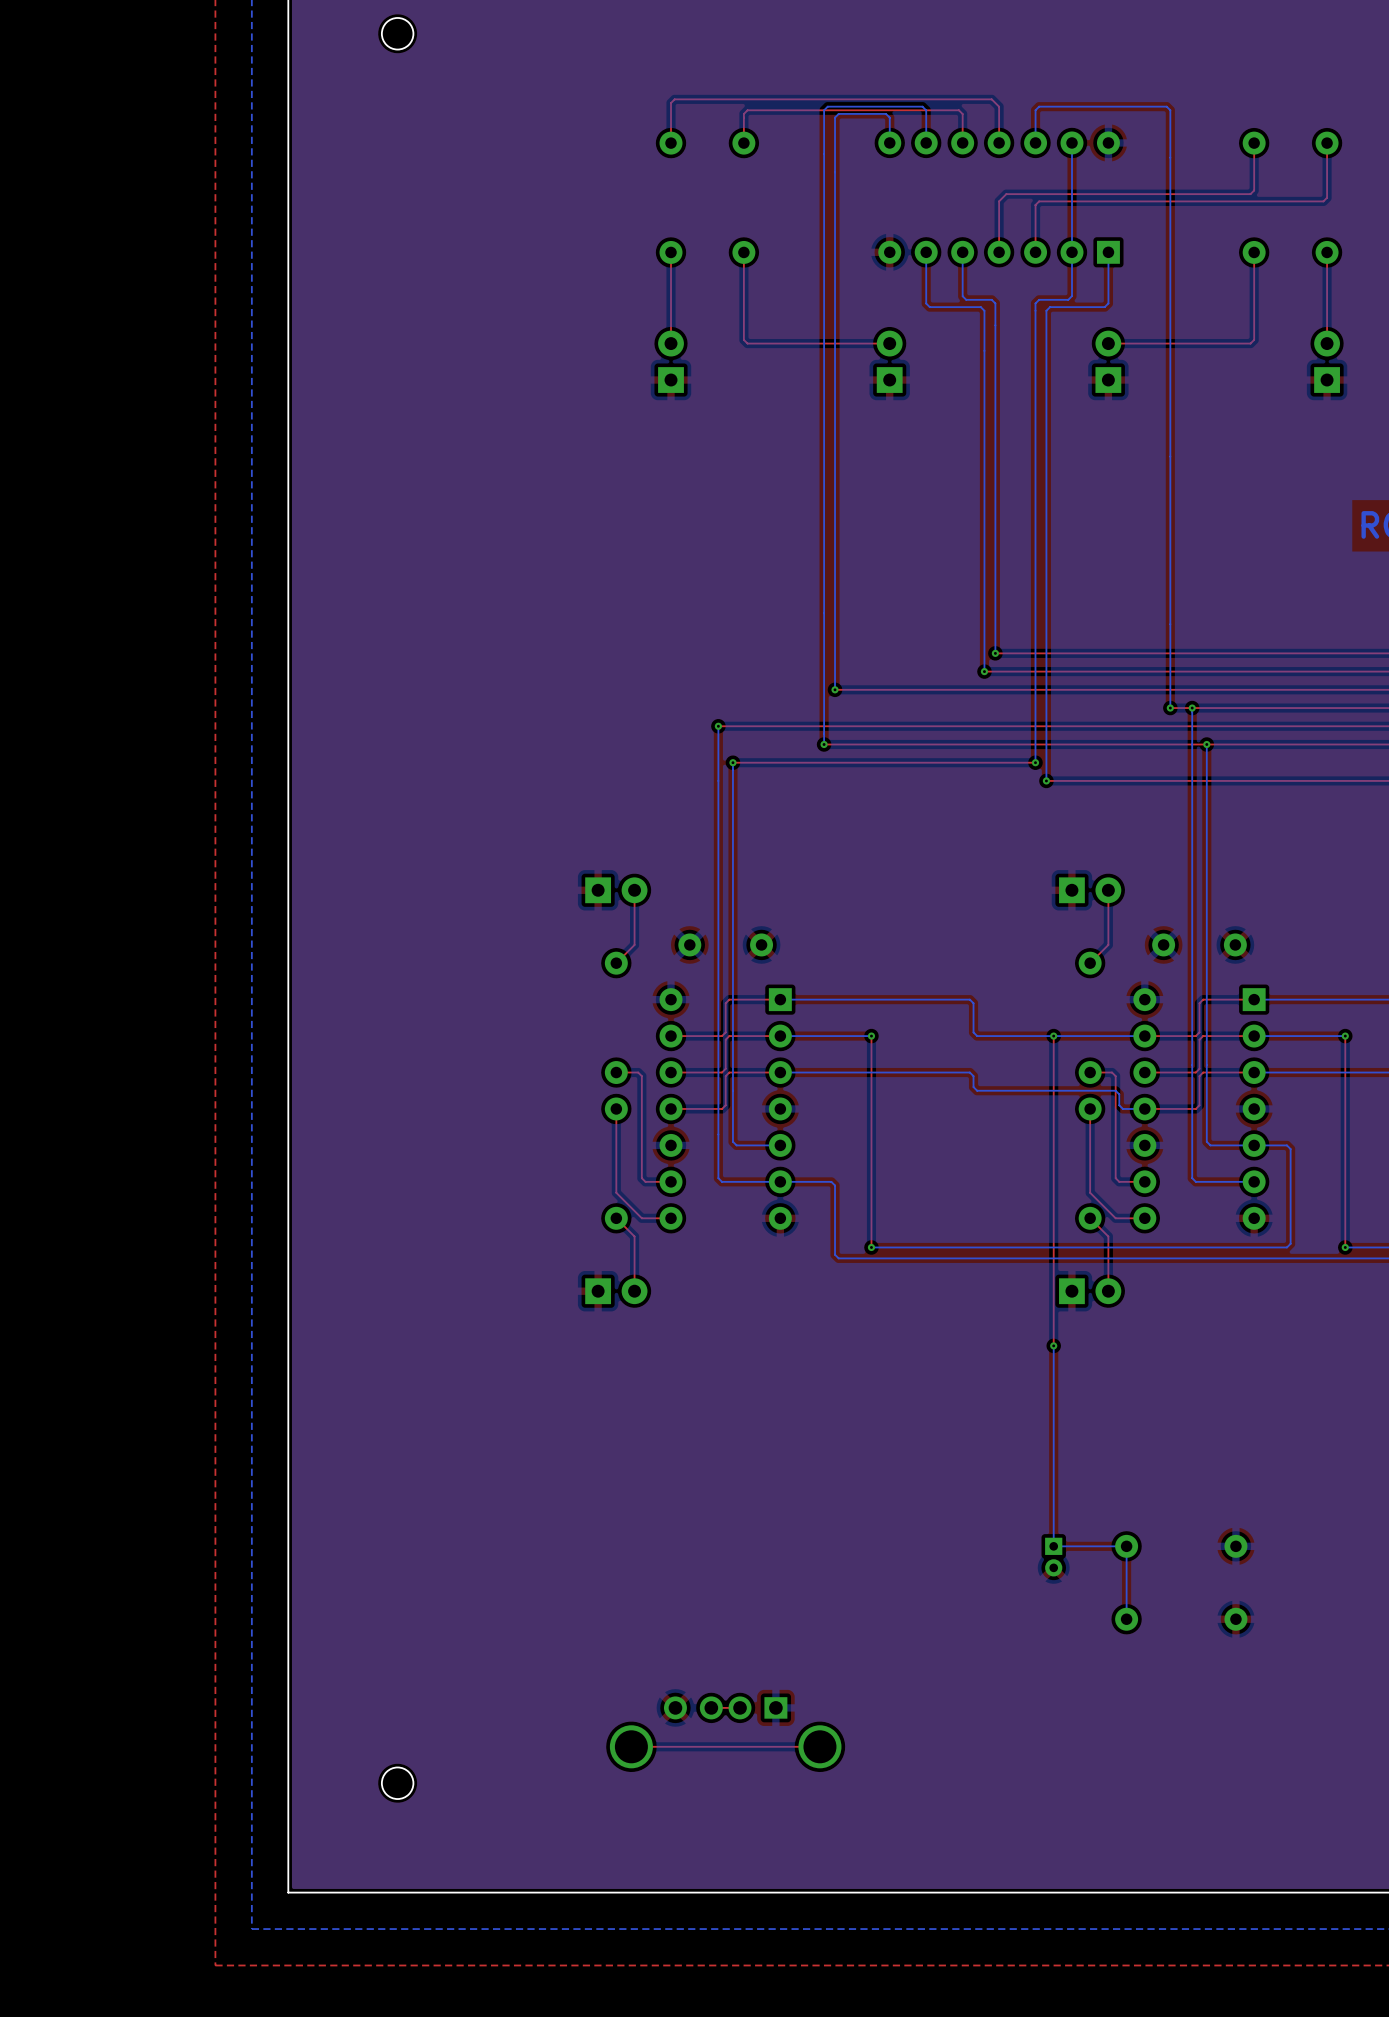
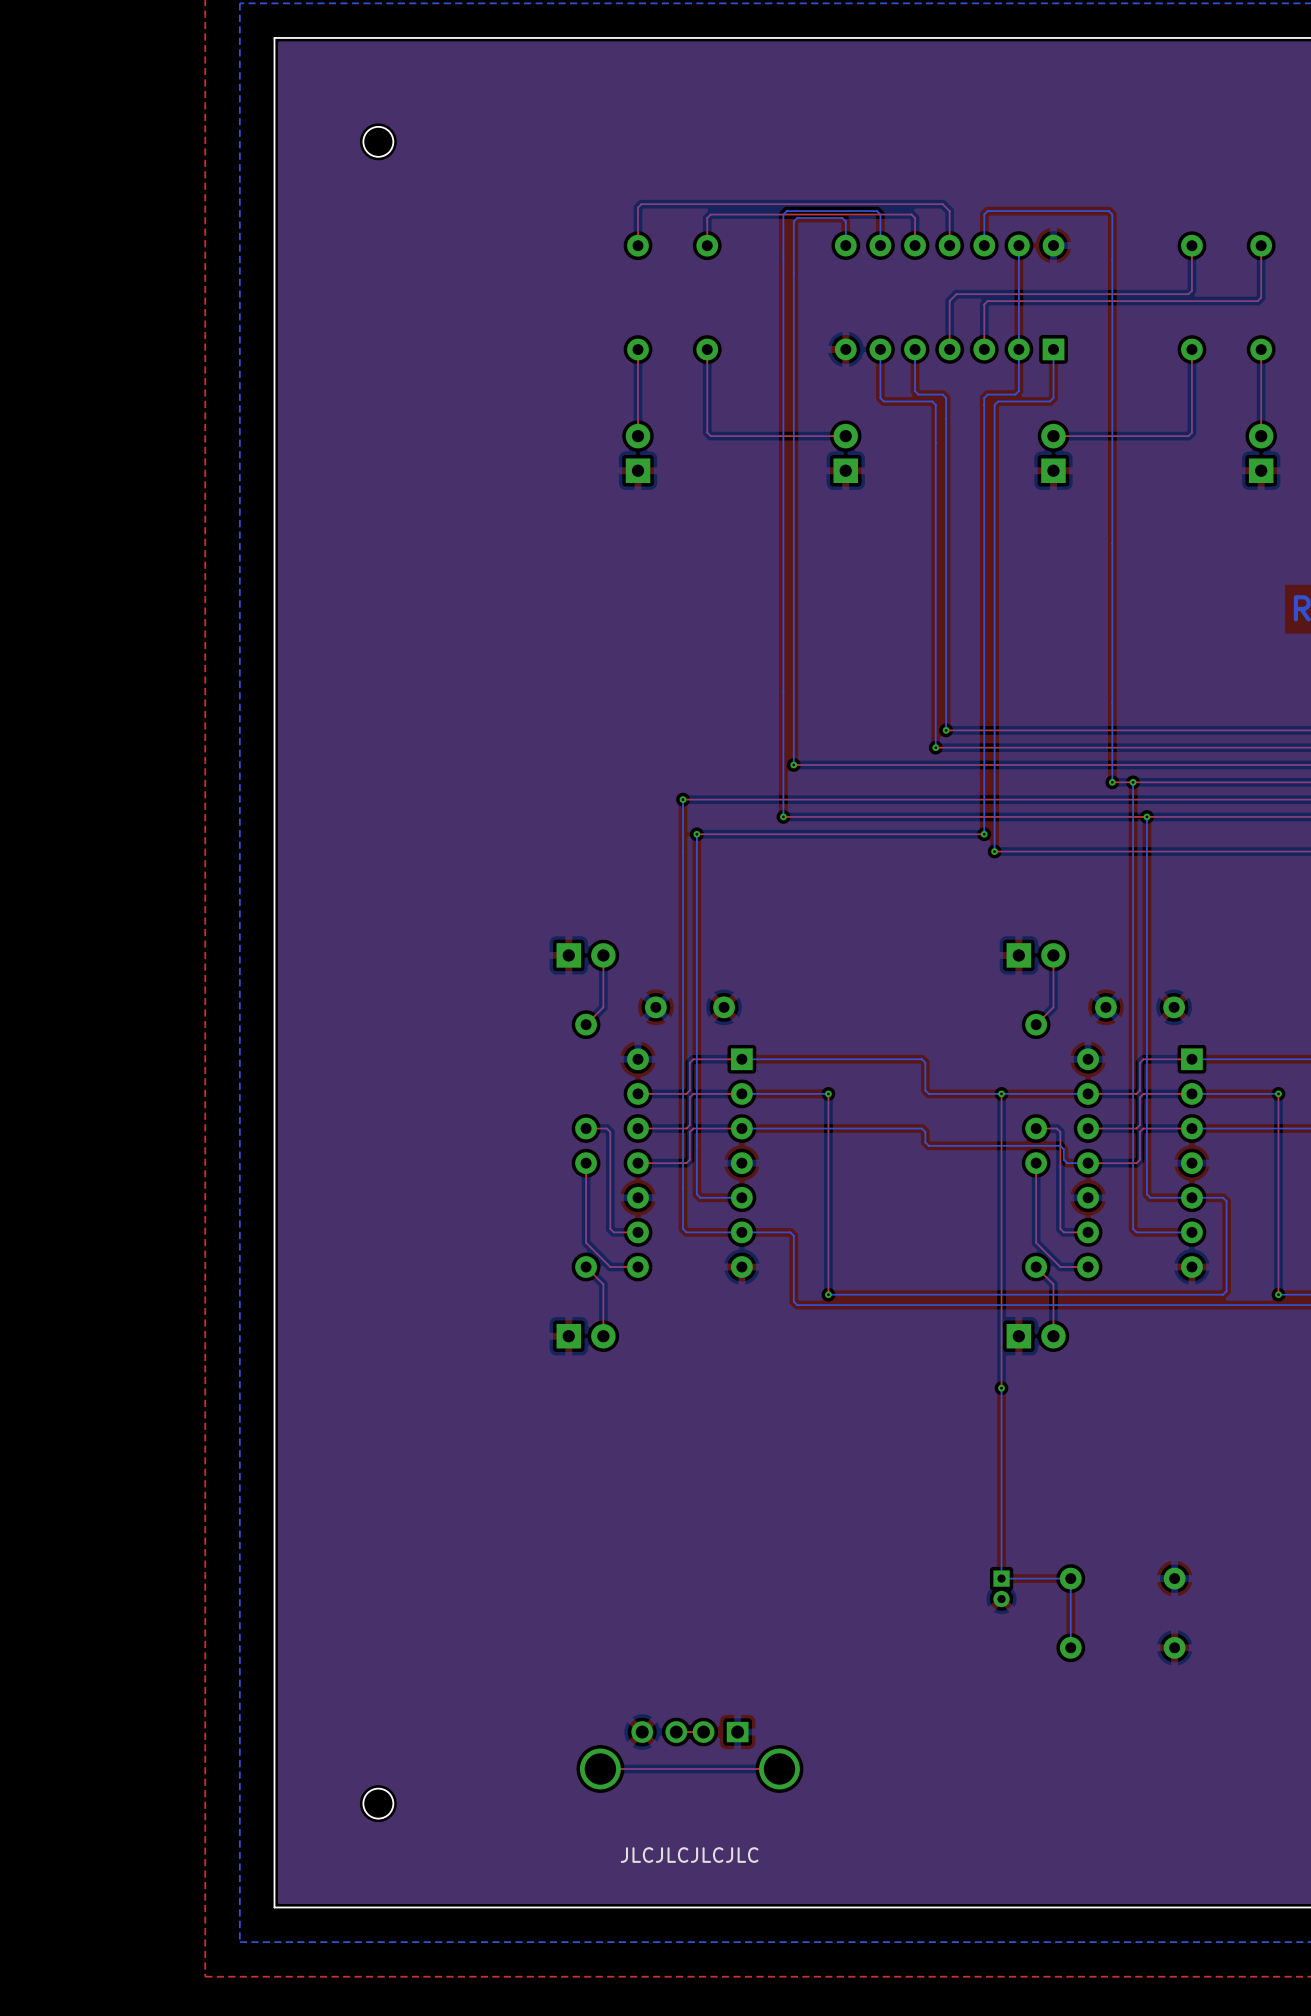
text: none -> JLCJLCJLCJLC (689, 1855)

